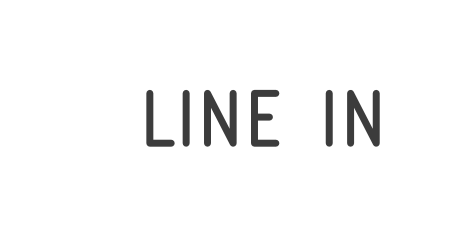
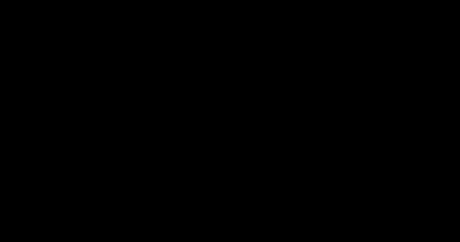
text: LINE IN (263, 118) -> none

